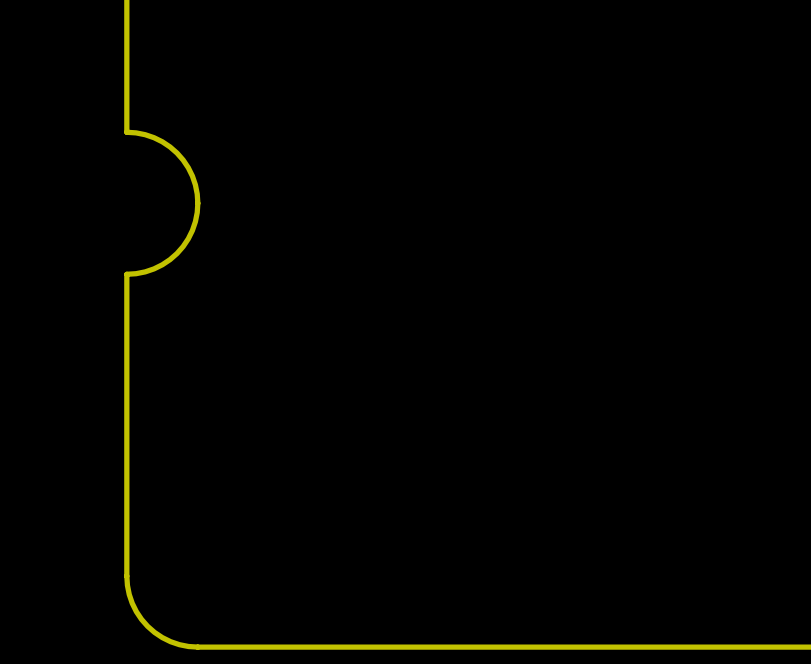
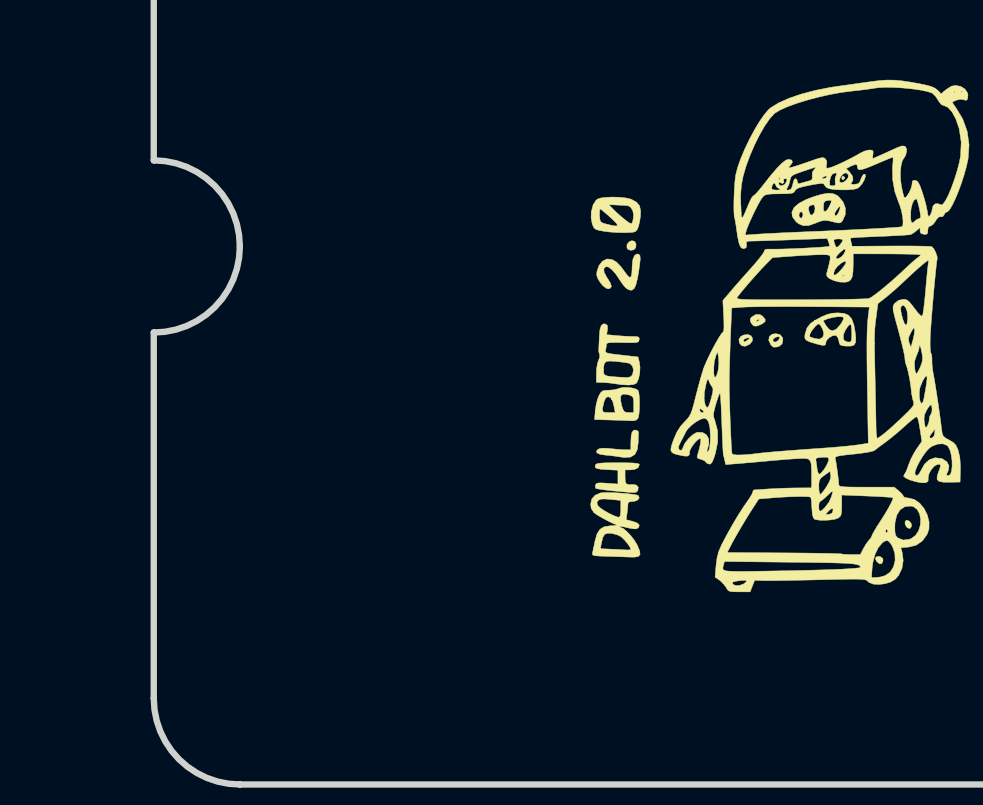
drawing: none -> [590, 79, 970, 593]

